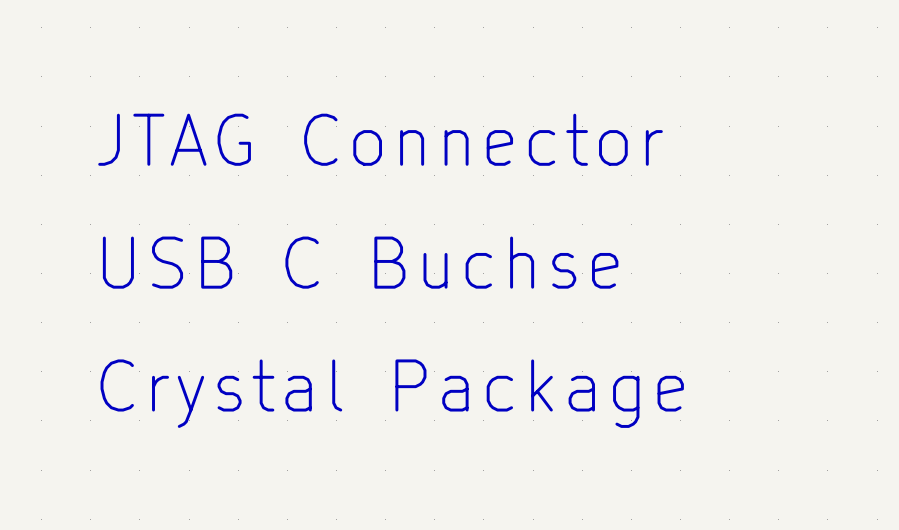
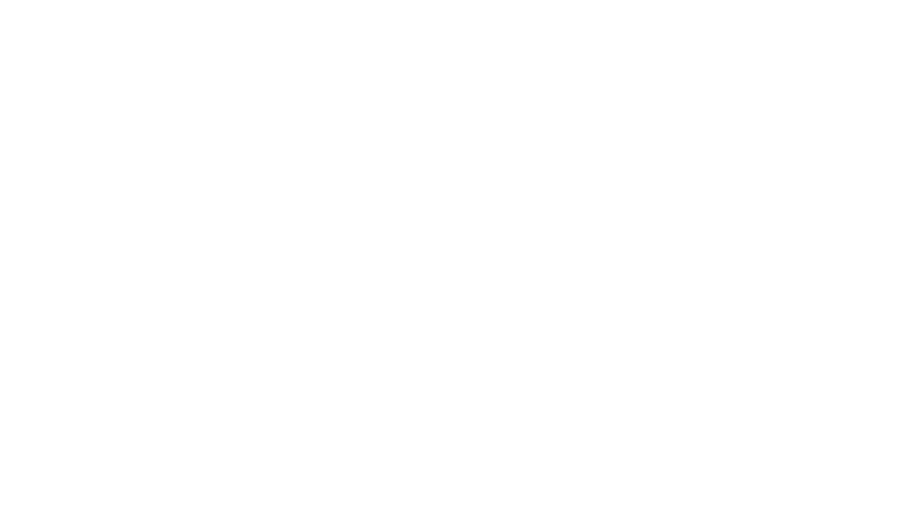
text: JTAG Connector (380, 139) -> none
text: USB C Buchse (360, 262) -> none
text: Crystal Package (392, 393) -> none

